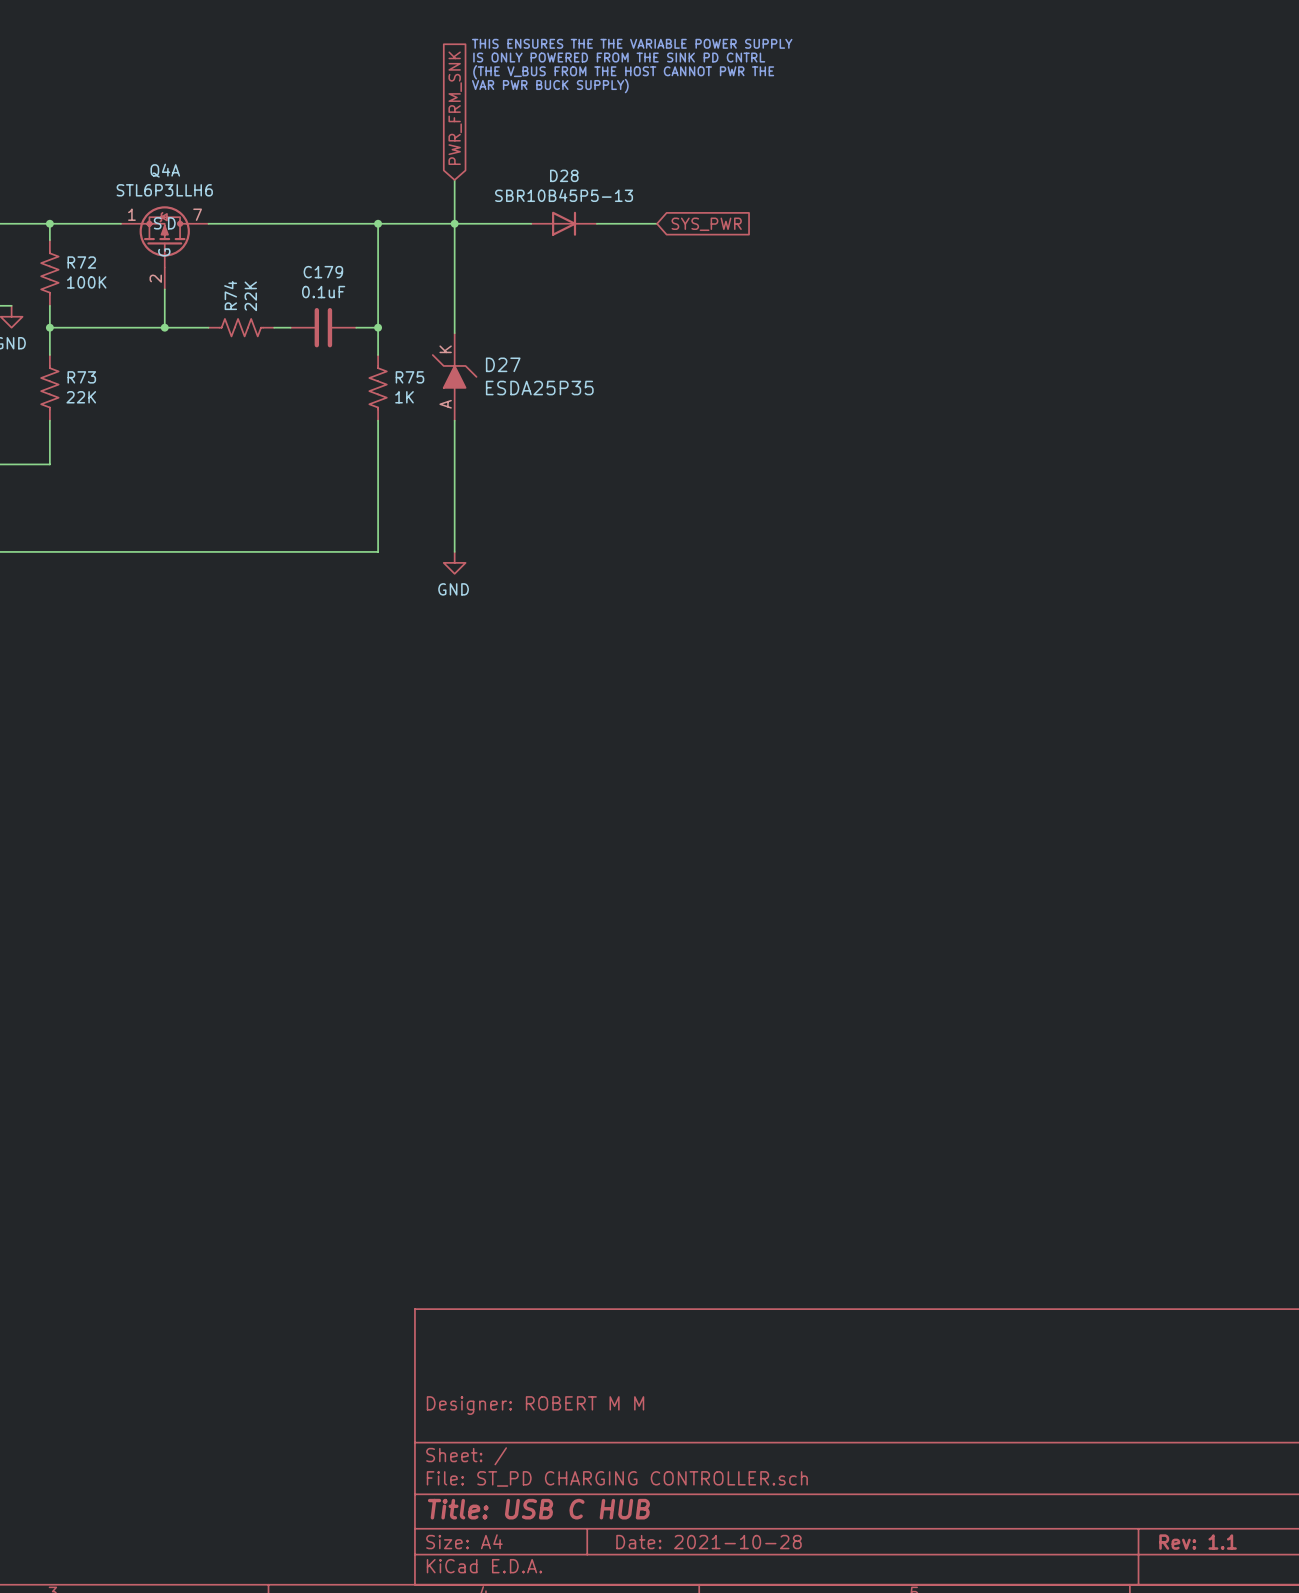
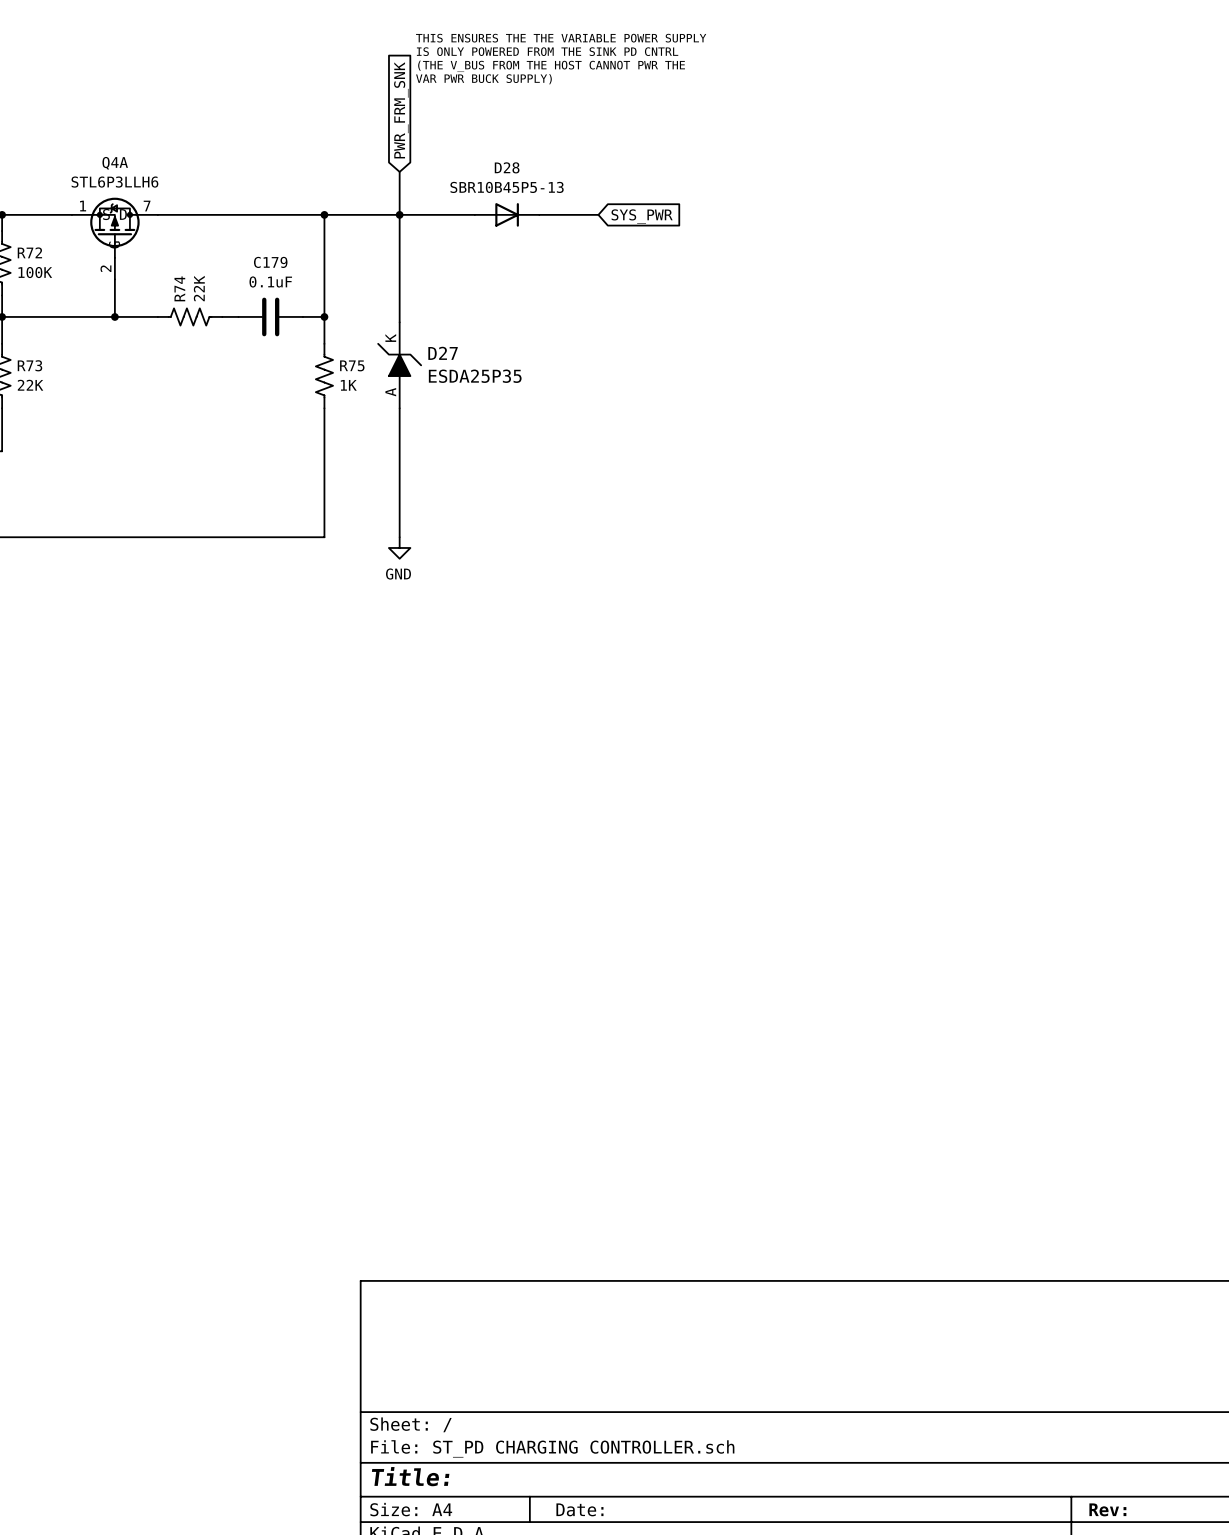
title block: Designer: ROBERT M M (535, 1405) -> none
title block: Title: USB C HUB (538, 1509) -> Title: (410, 1476)
title block: Date: 2021-10-28 (709, 1542) -> Date: (579, 1509)
title block: Rev: 1.1 (1198, 1542) -> Rev: (1107, 1509)

